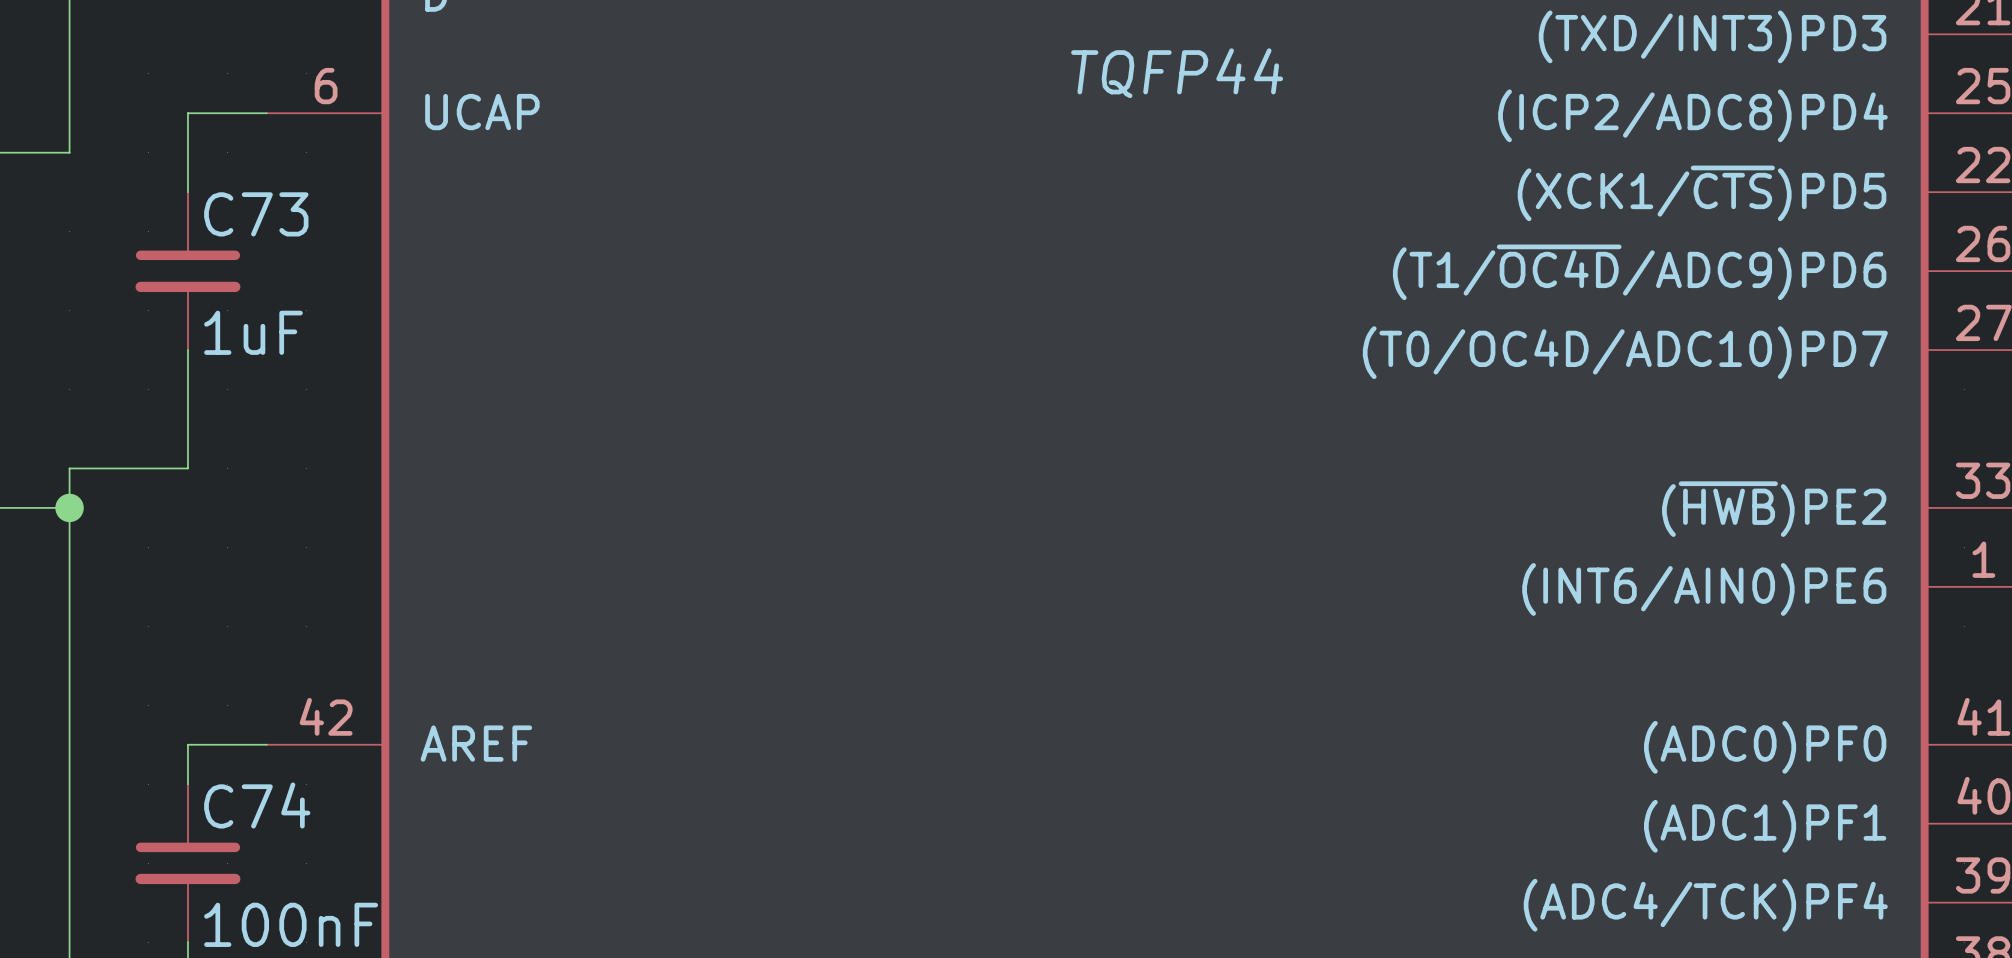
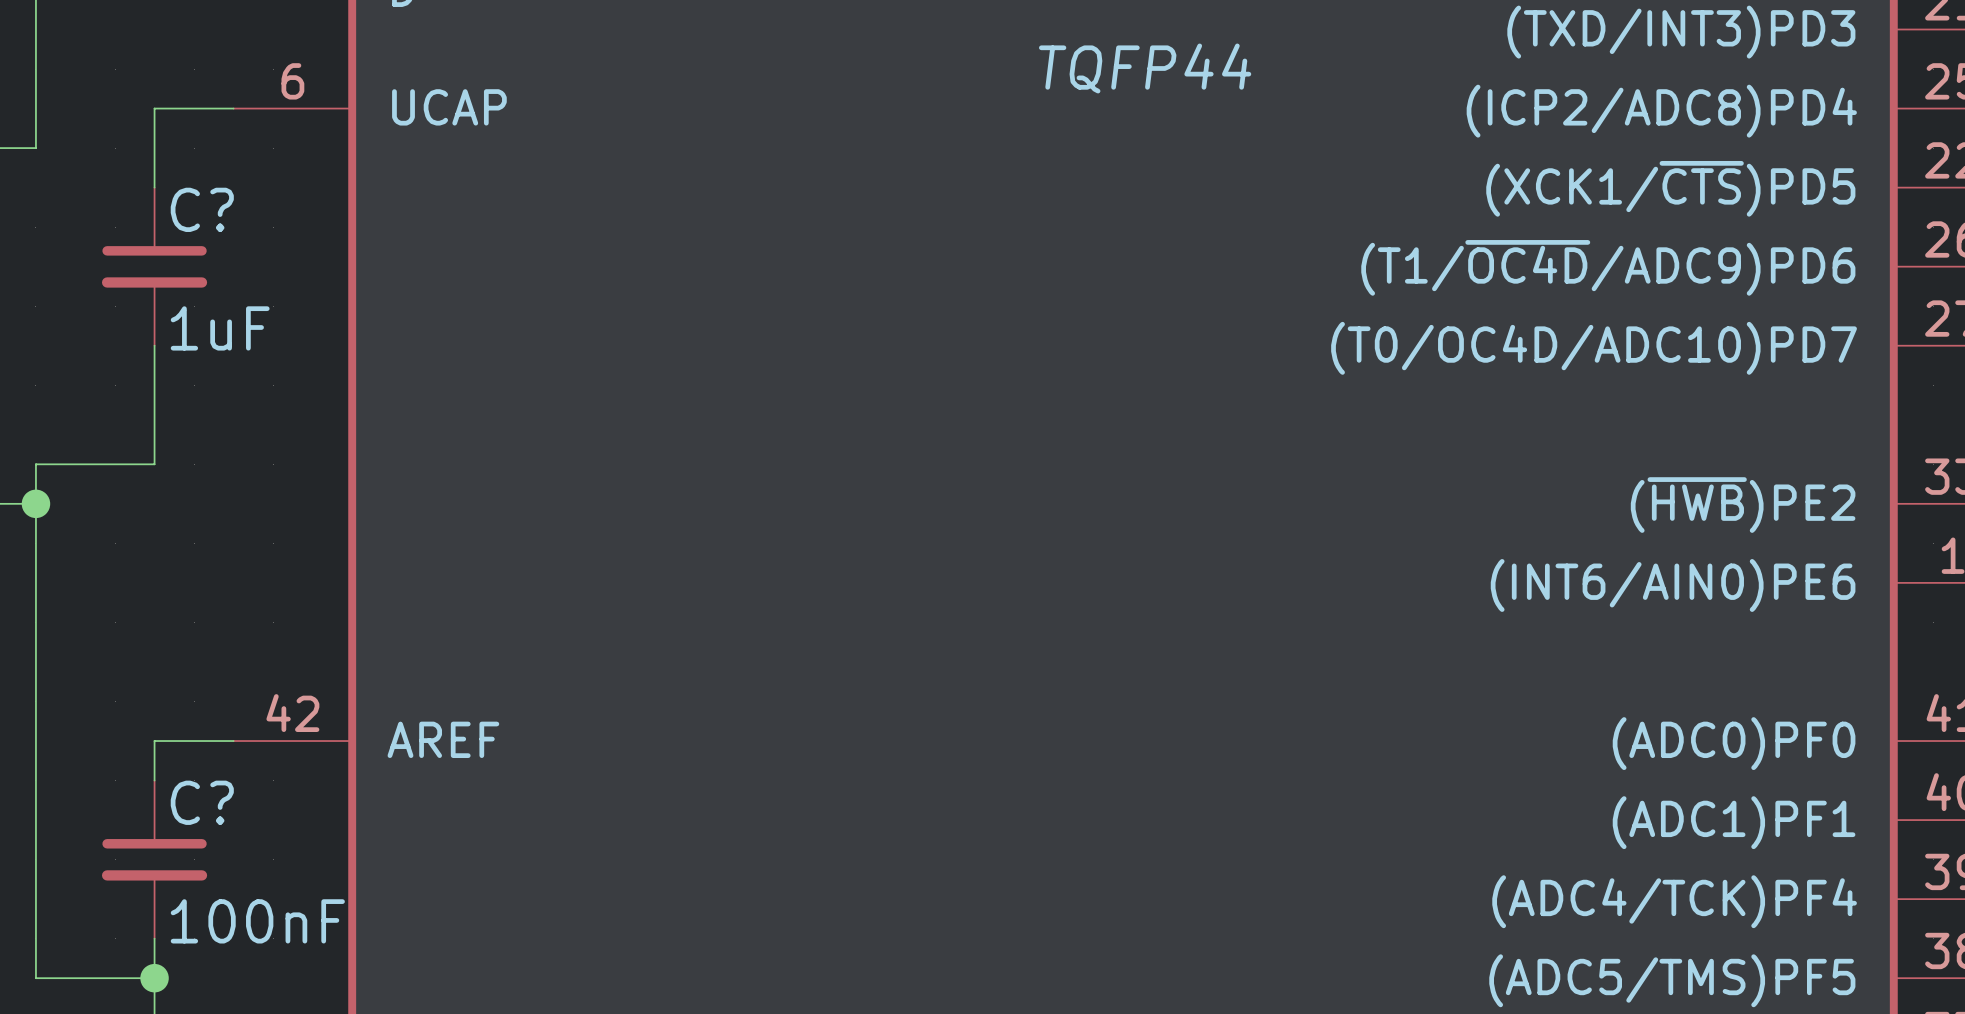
C73 name: C73 (256, 214) -> C? (202, 209)
C74 name: C74 (257, 805) -> C? (202, 802)

